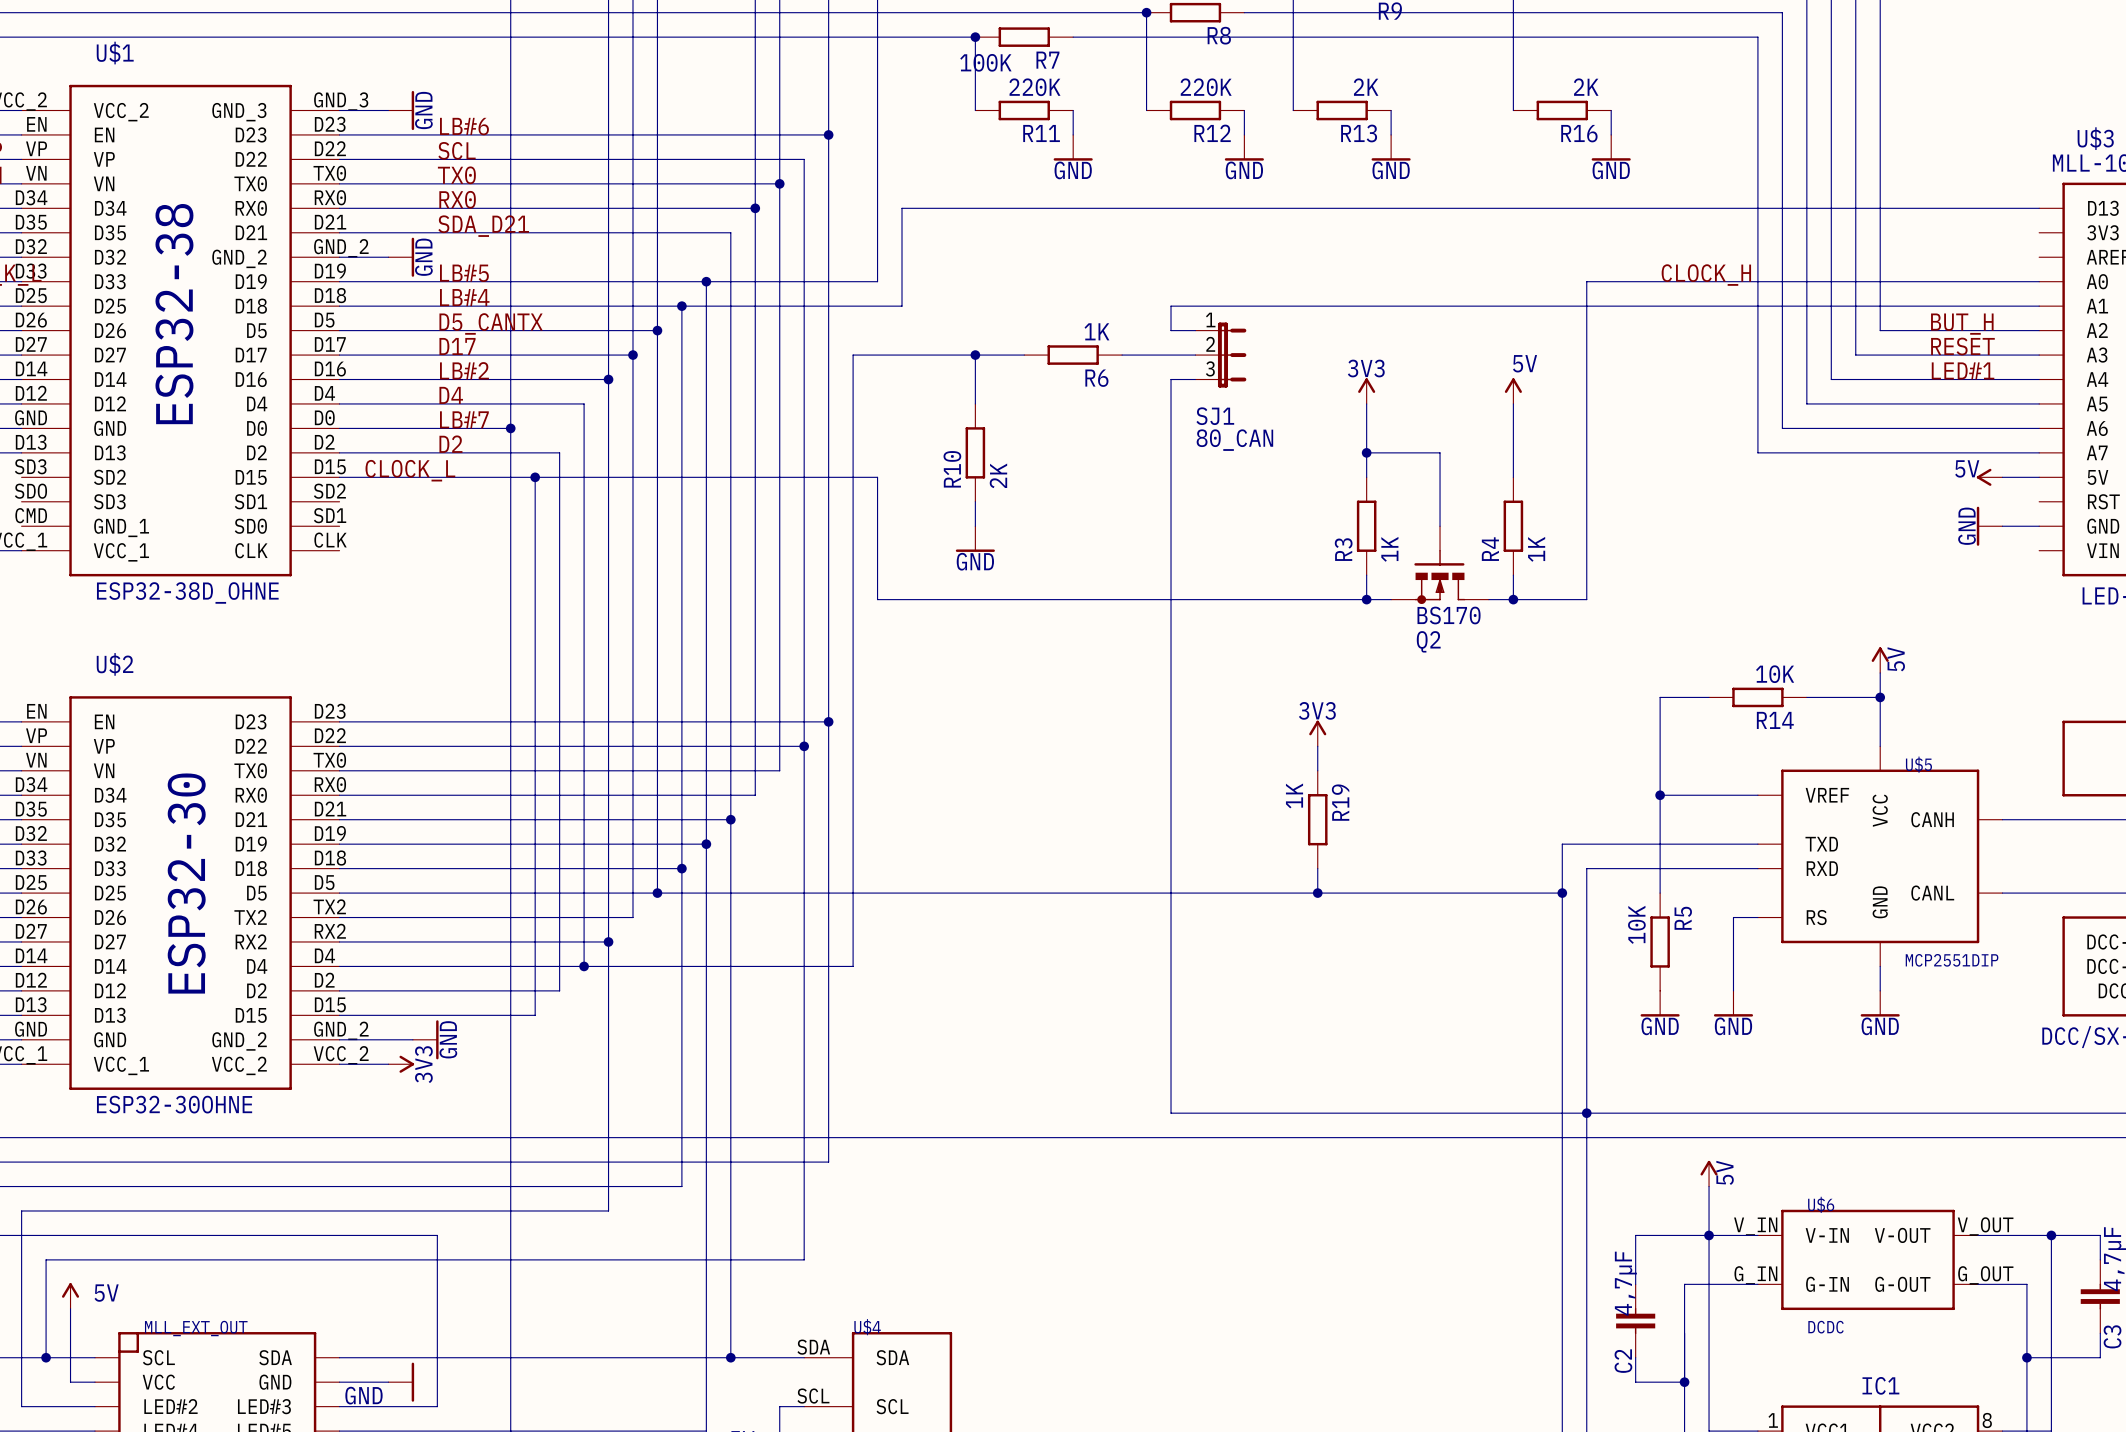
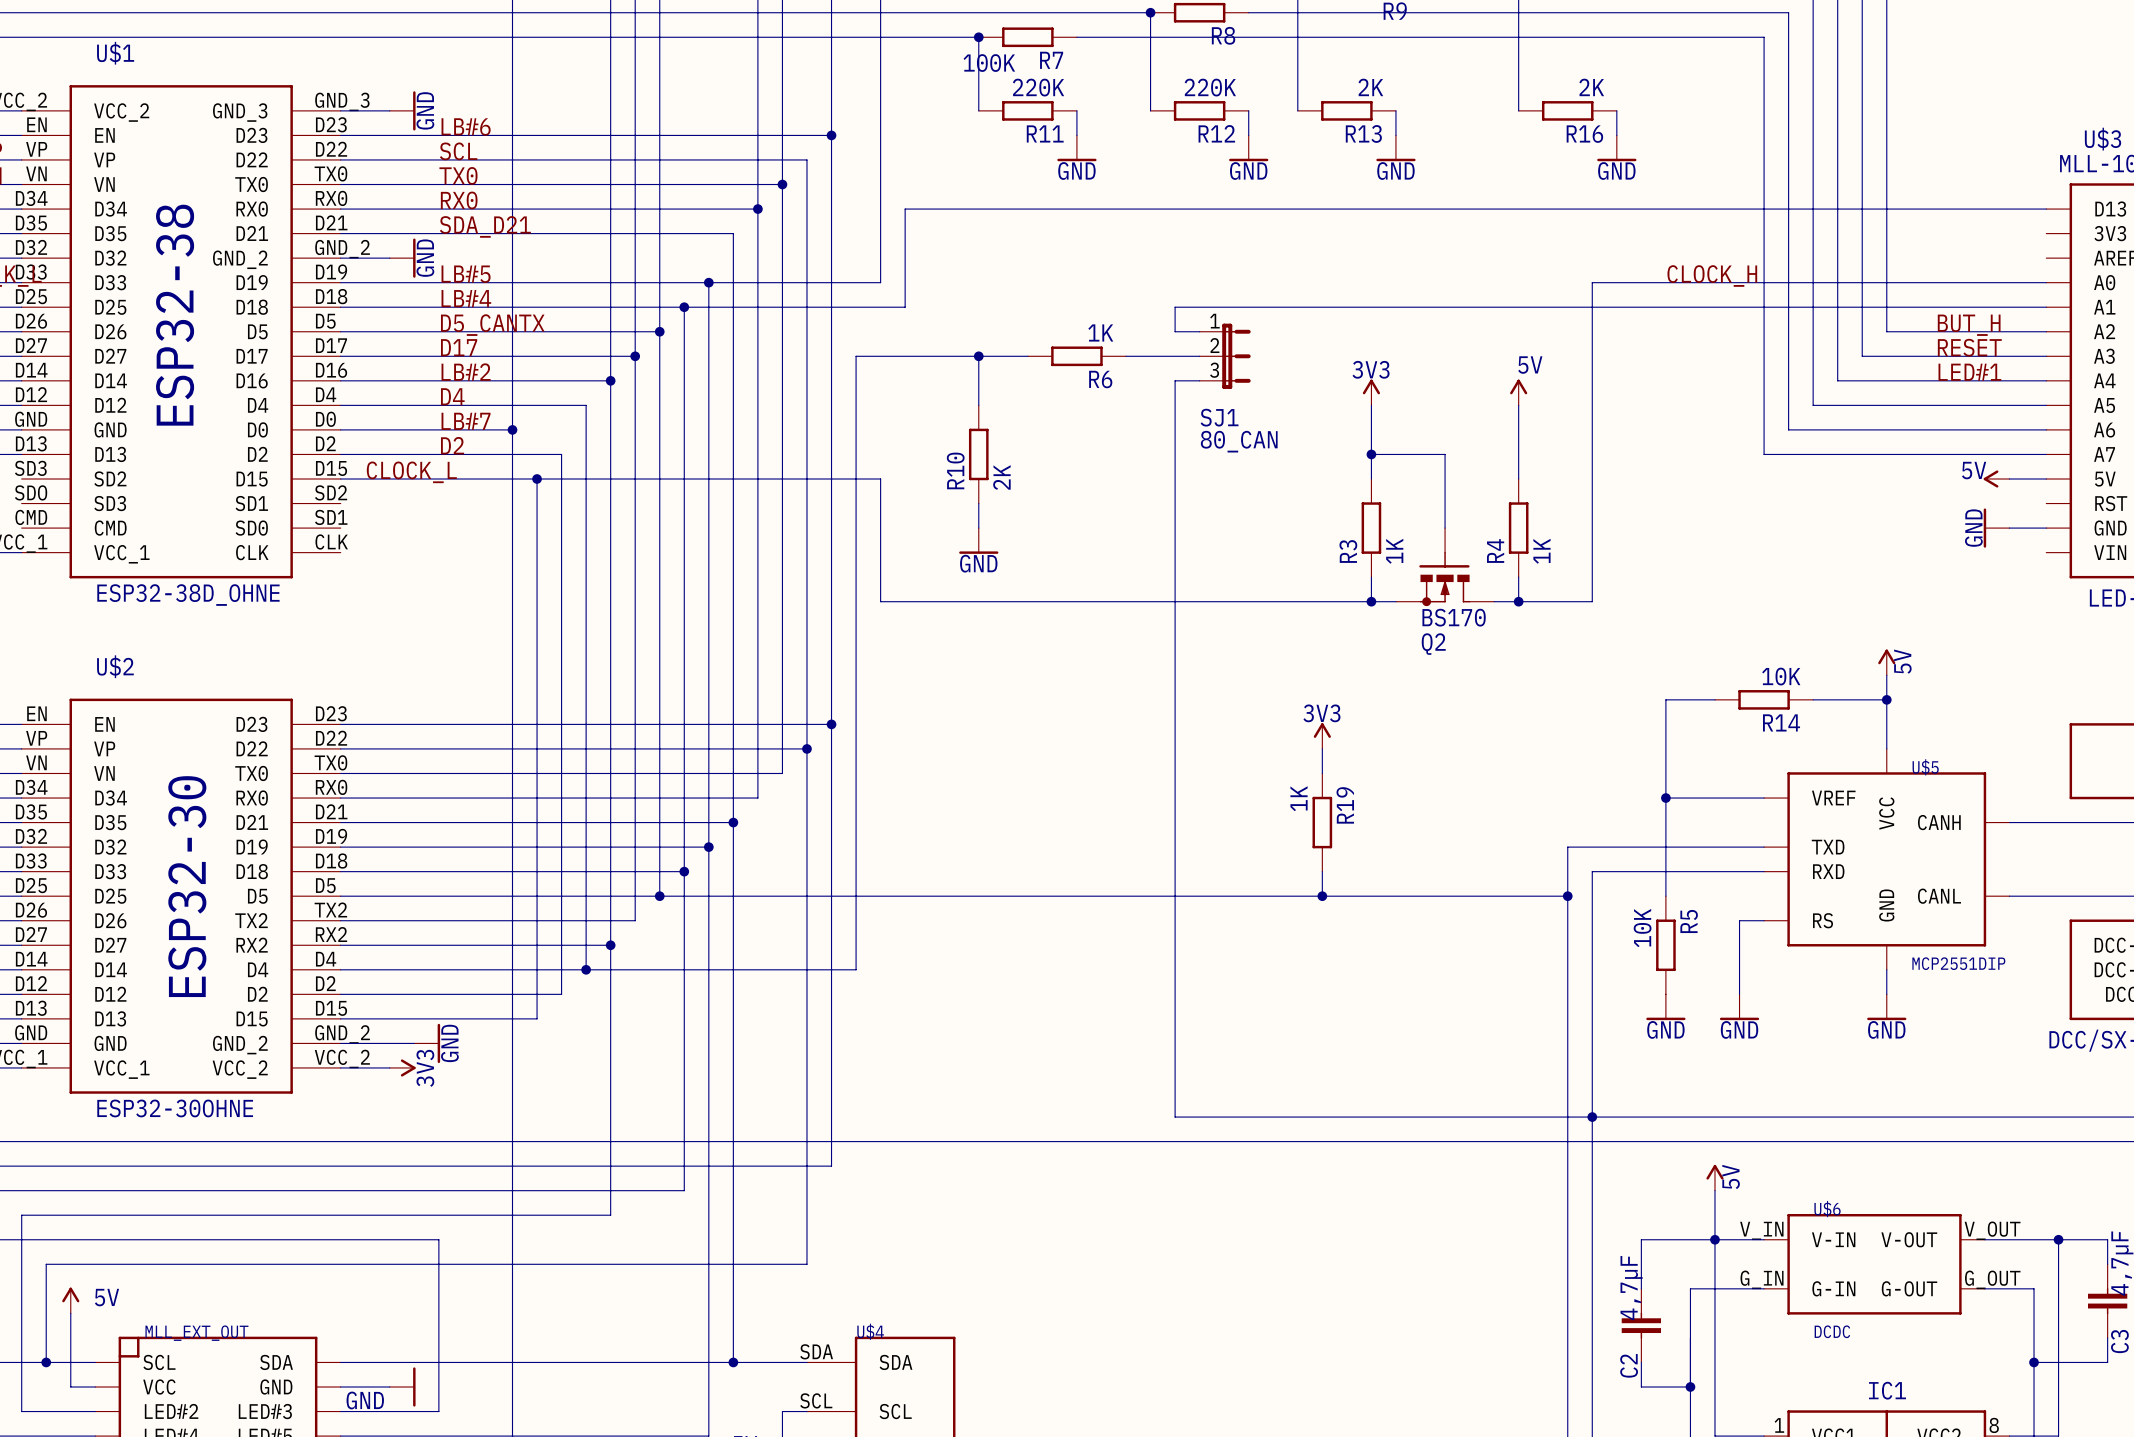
U$1 pin name: GND_1 (121, 527) -> CMD (110, 528)

